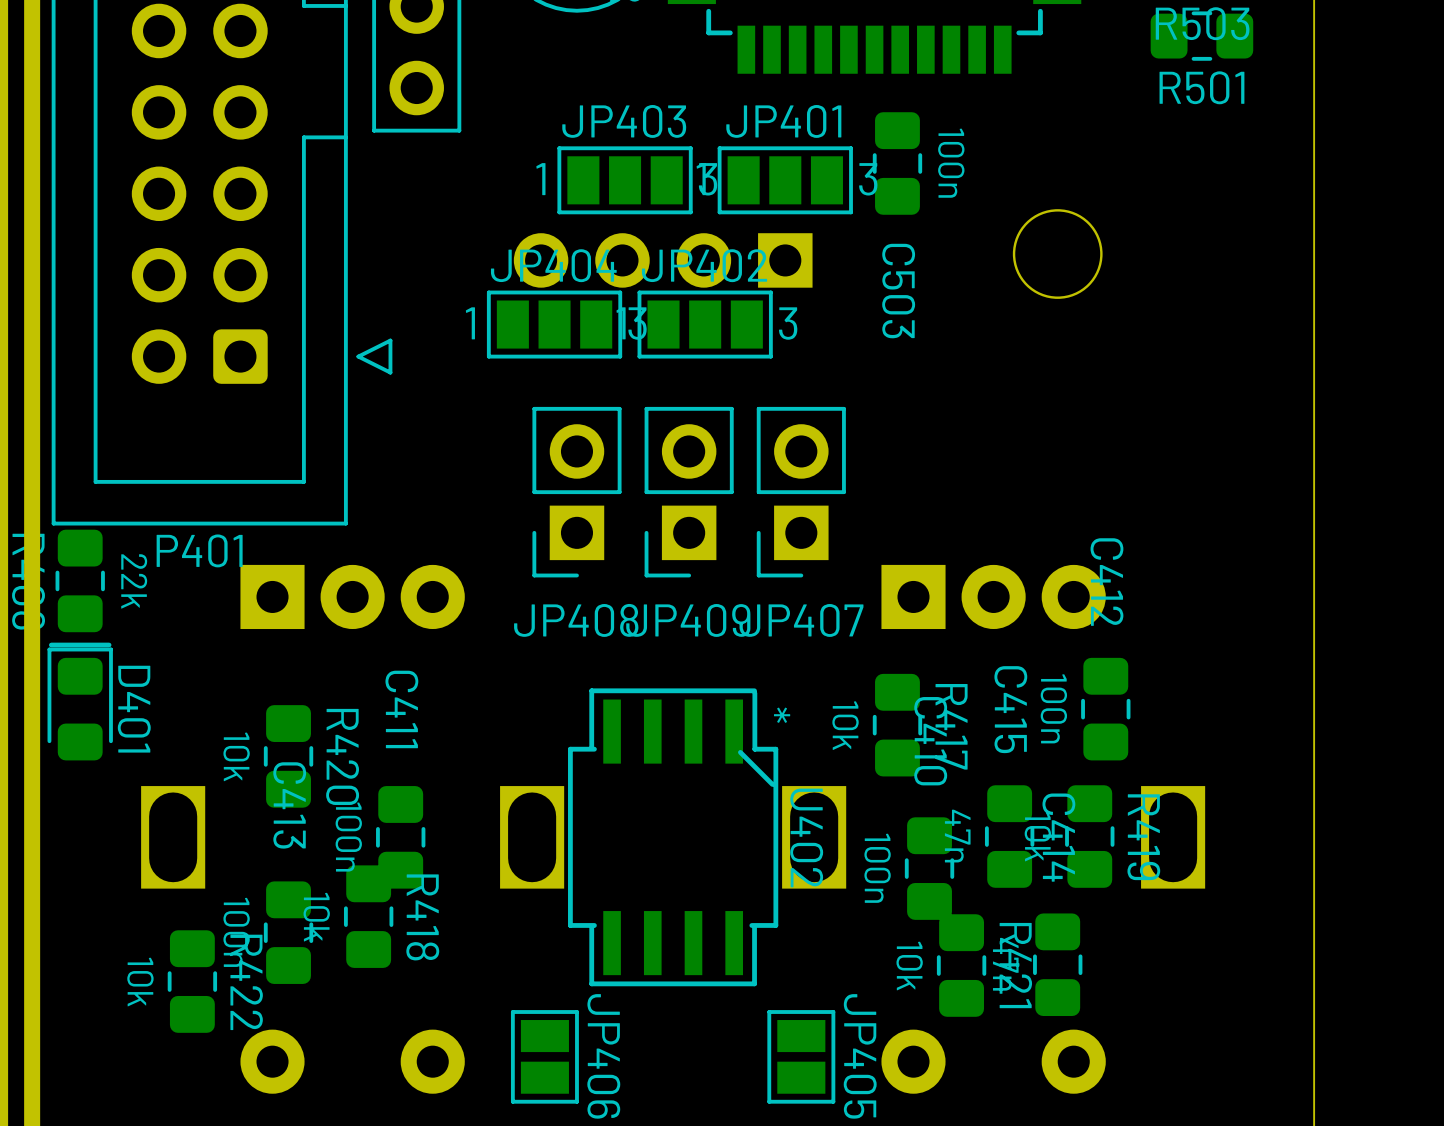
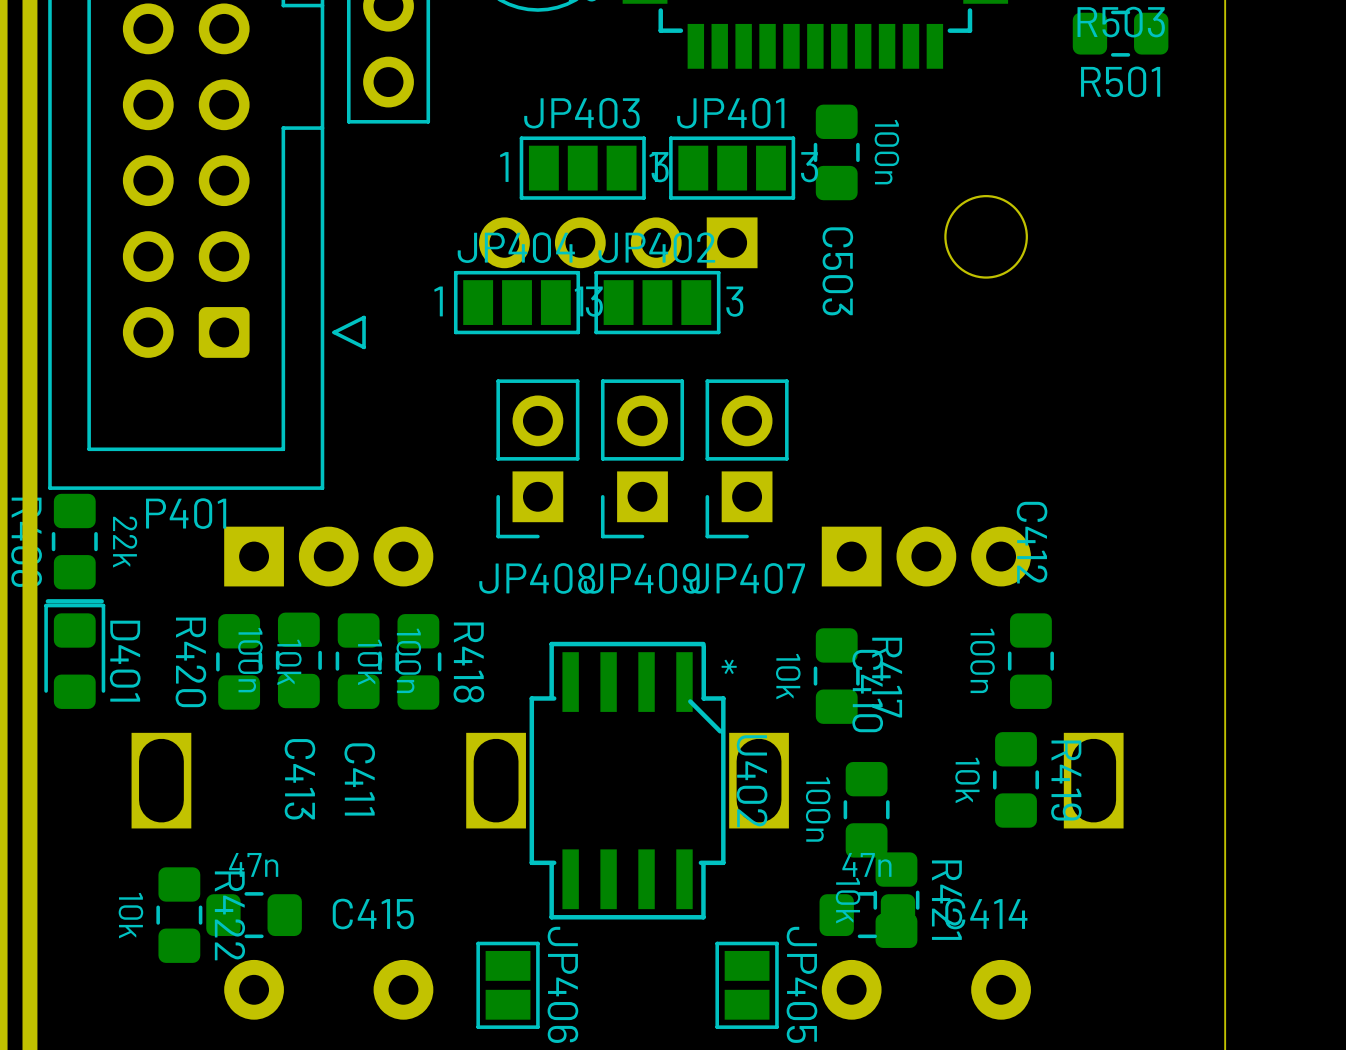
C411 name position: C411 (401, 709) -> C411 (359, 779)
R420 value position: 10k (236, 756) -> 10k (289, 662)
R420 position: (288, 756) -> (239, 661)
R420 name position: R420 (342, 756) -> R420 (190, 662)
C413 name position: C413 (289, 805) -> C413 (299, 779)
C415 rotation: 0° (1009, 836) -> 90° clockwise (254, 915)
C415 position: (1009, 836) -> (254, 915)
C411 value position: 100n (348, 837) -> 100n (408, 660)
C411 position: (400, 837) -> (358, 661)
R418 position: (368, 916) -> (418, 661)
C413 position: (288, 932) -> (298, 660)
C414 rotation: 0° (1057, 964) -> 90° clockwise (867, 915)
C414 position: (1057, 964) -> (867, 915)

